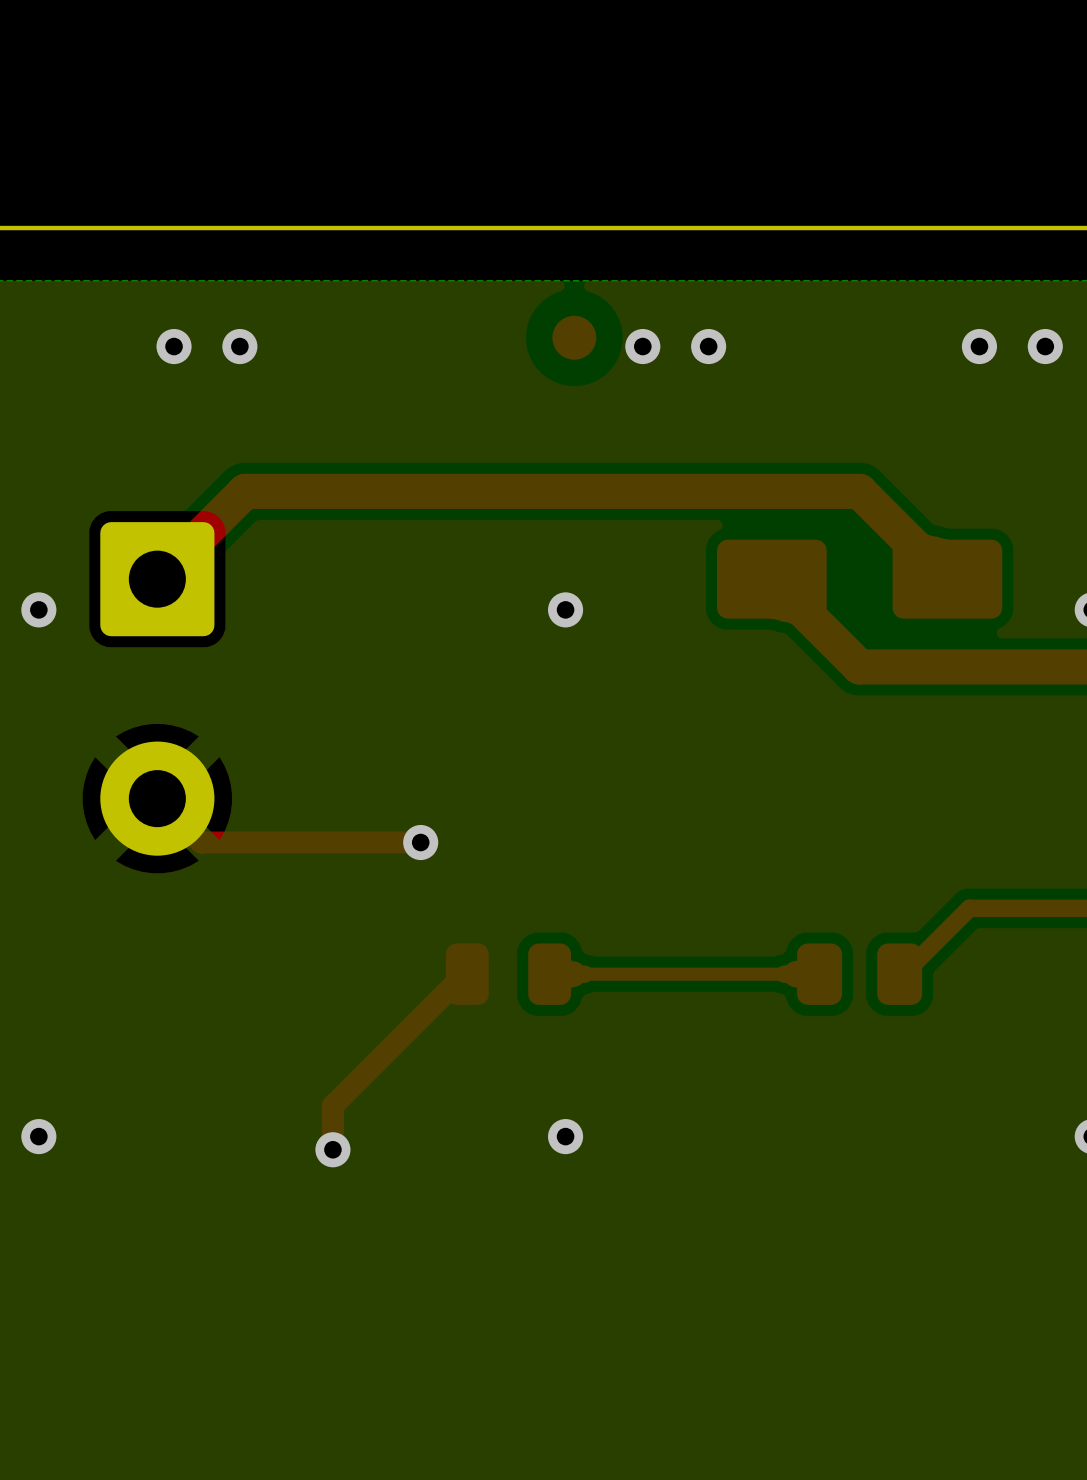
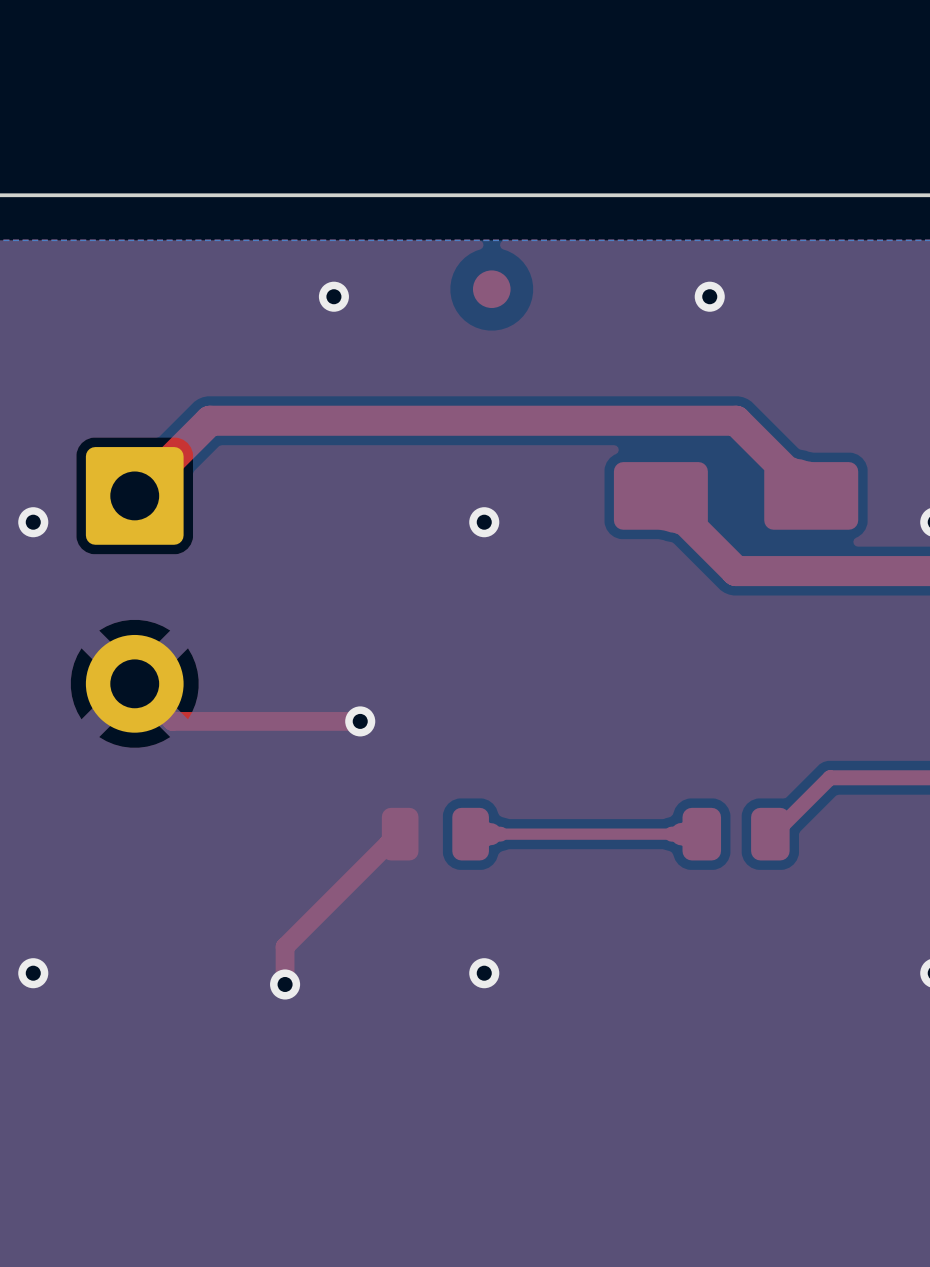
via: (174, 346) -> none
via: (239, 346) -> none
via: none -> (333, 296)
via: (642, 346) -> none
via: (708, 346) -> none
via: none -> (709, 296)
via: (979, 346) -> none
via: (1045, 346) -> none

